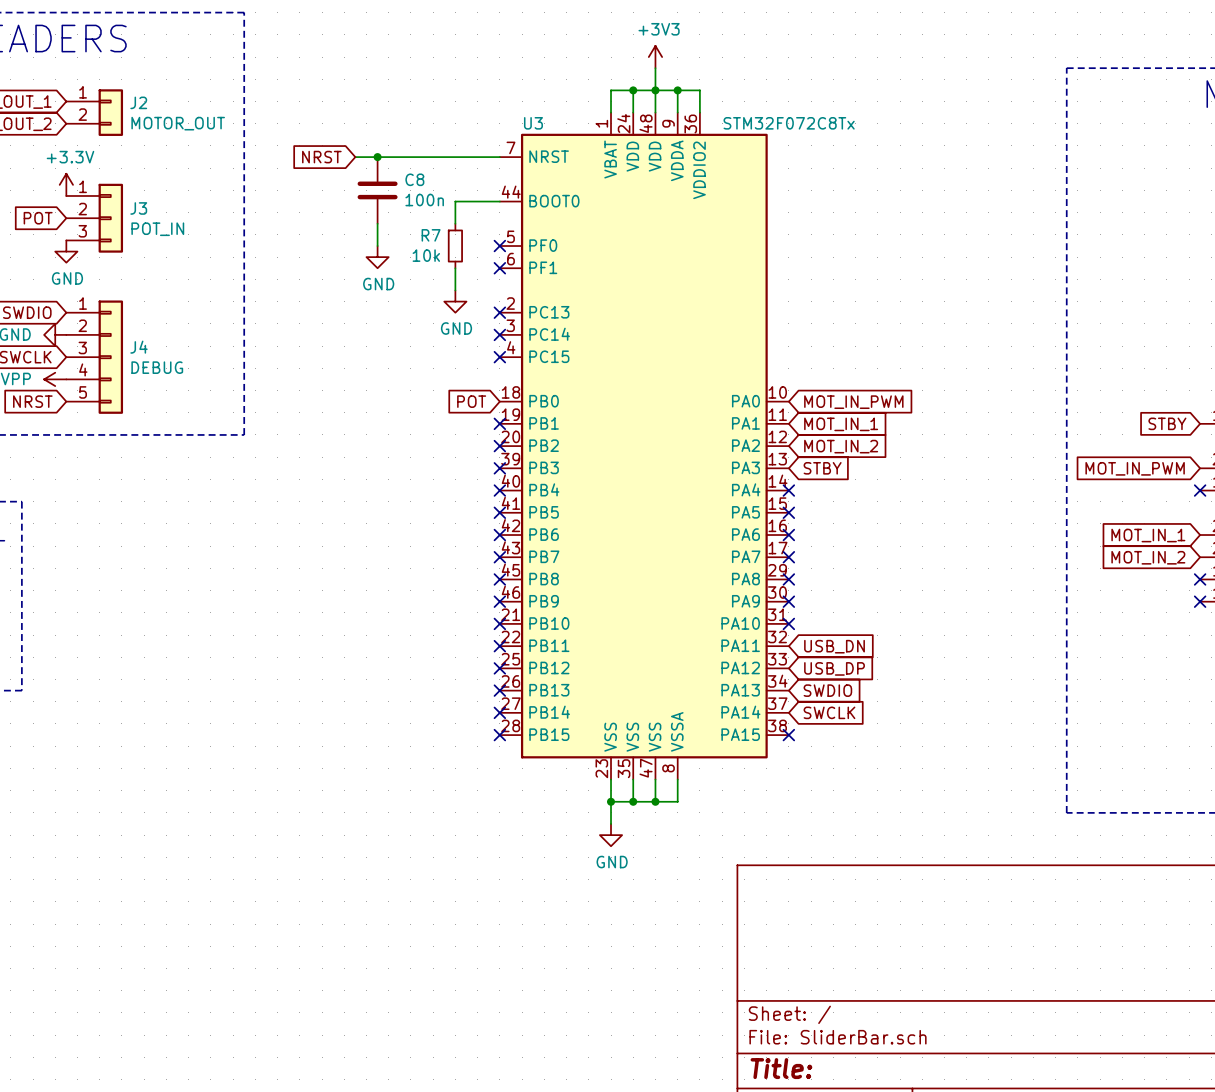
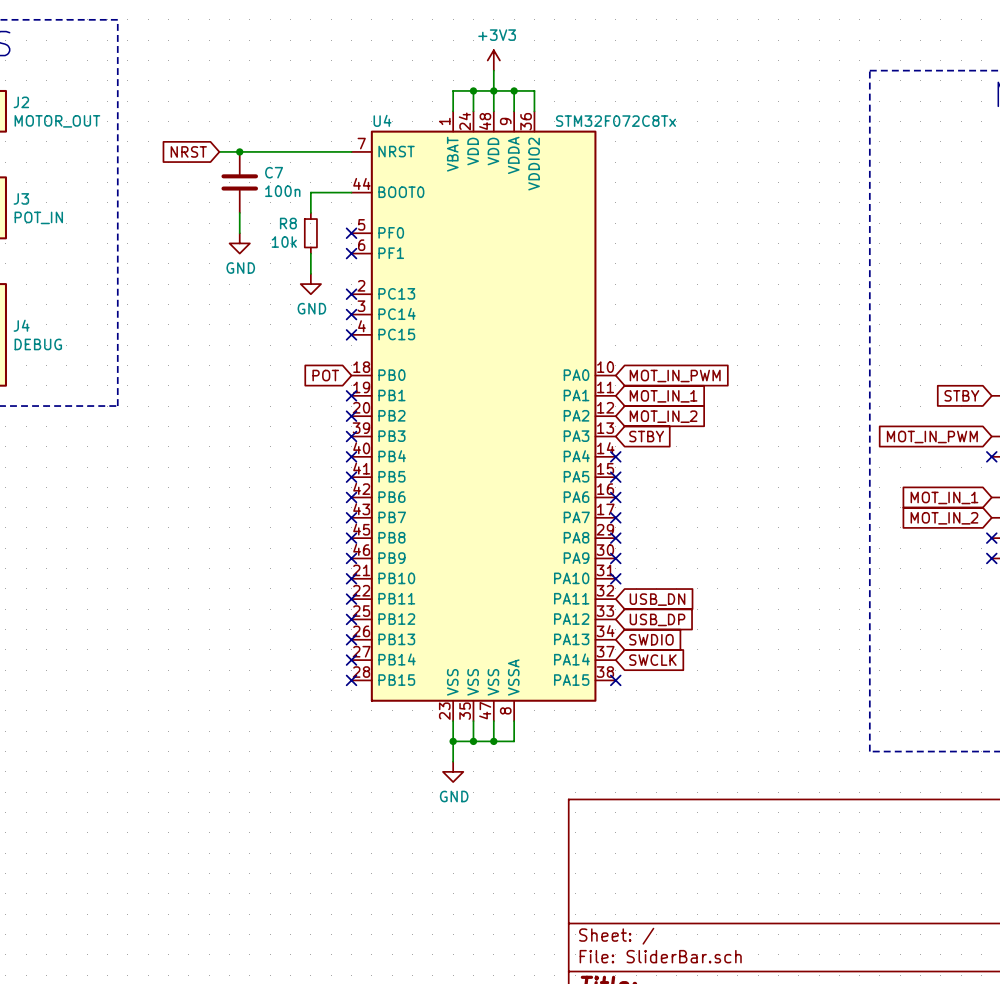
U3 name: U3 (533, 123) -> U4 (382, 120)
C8 name: C8 (414, 179) -> C7 (274, 172)
R7 name: R7 (431, 235) -> R8 (288, 223)

